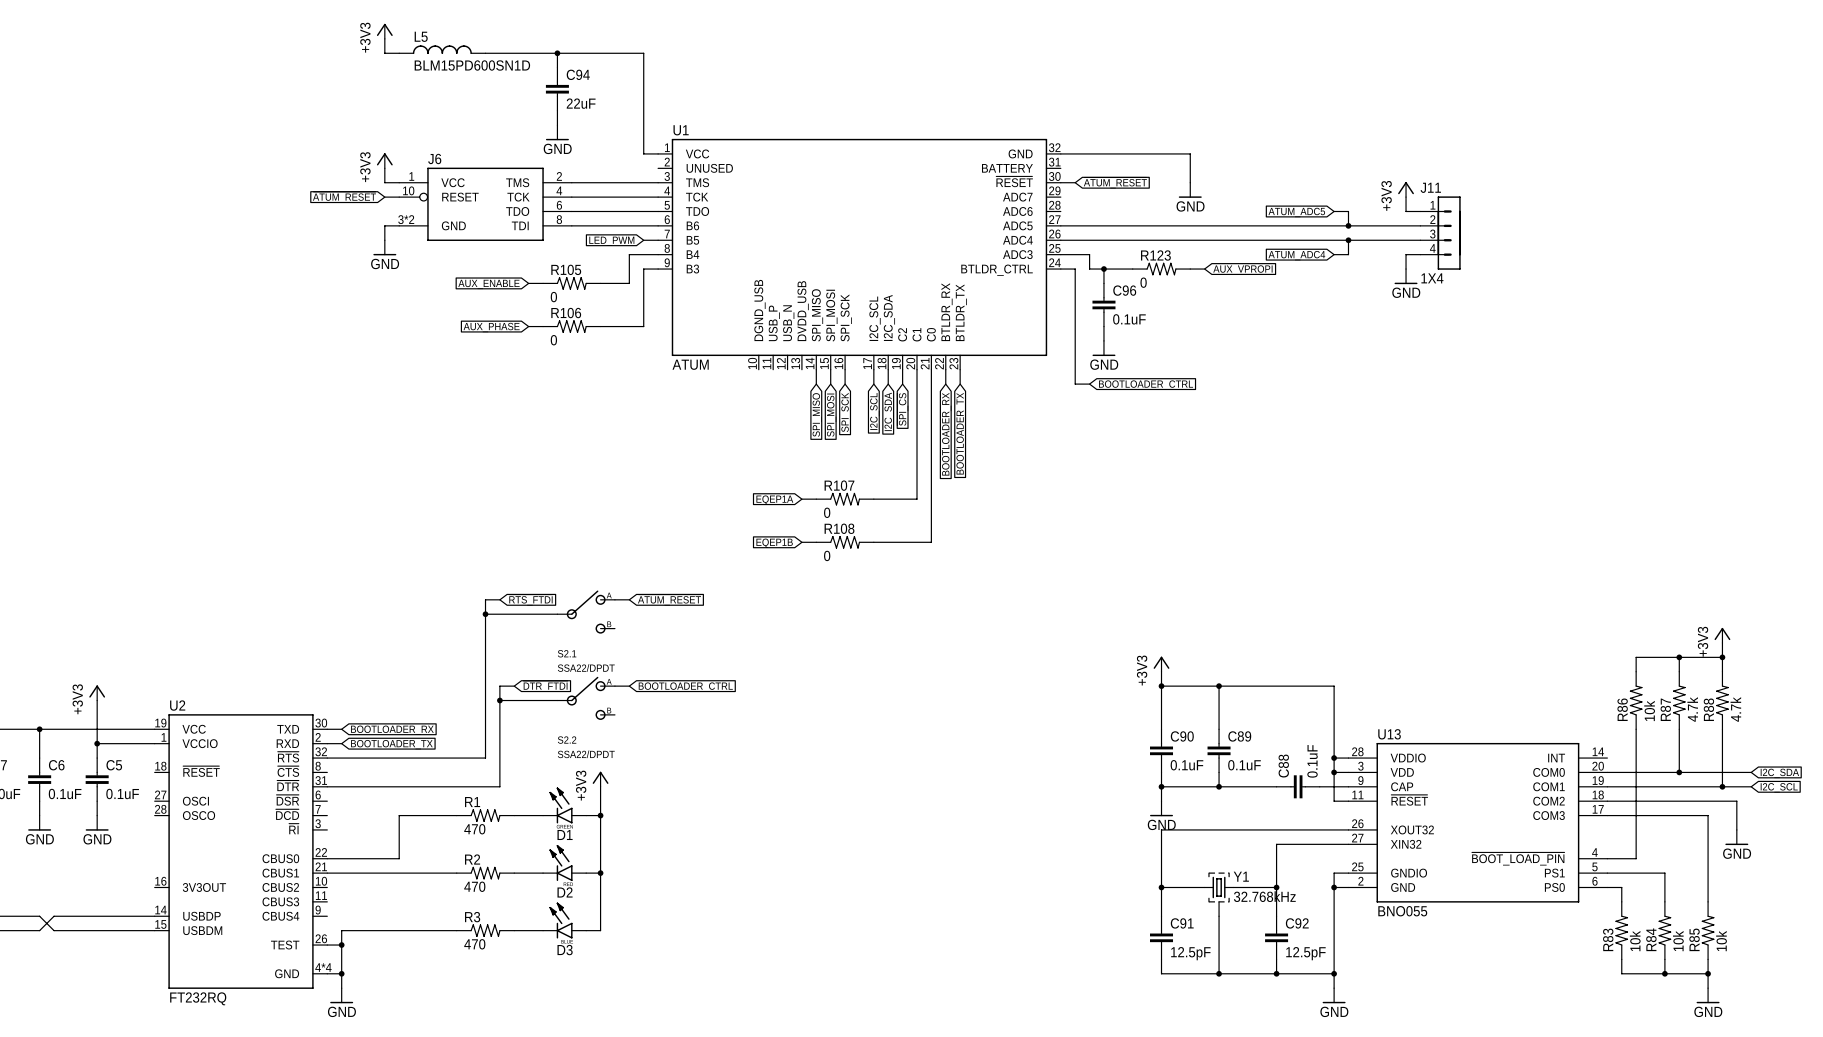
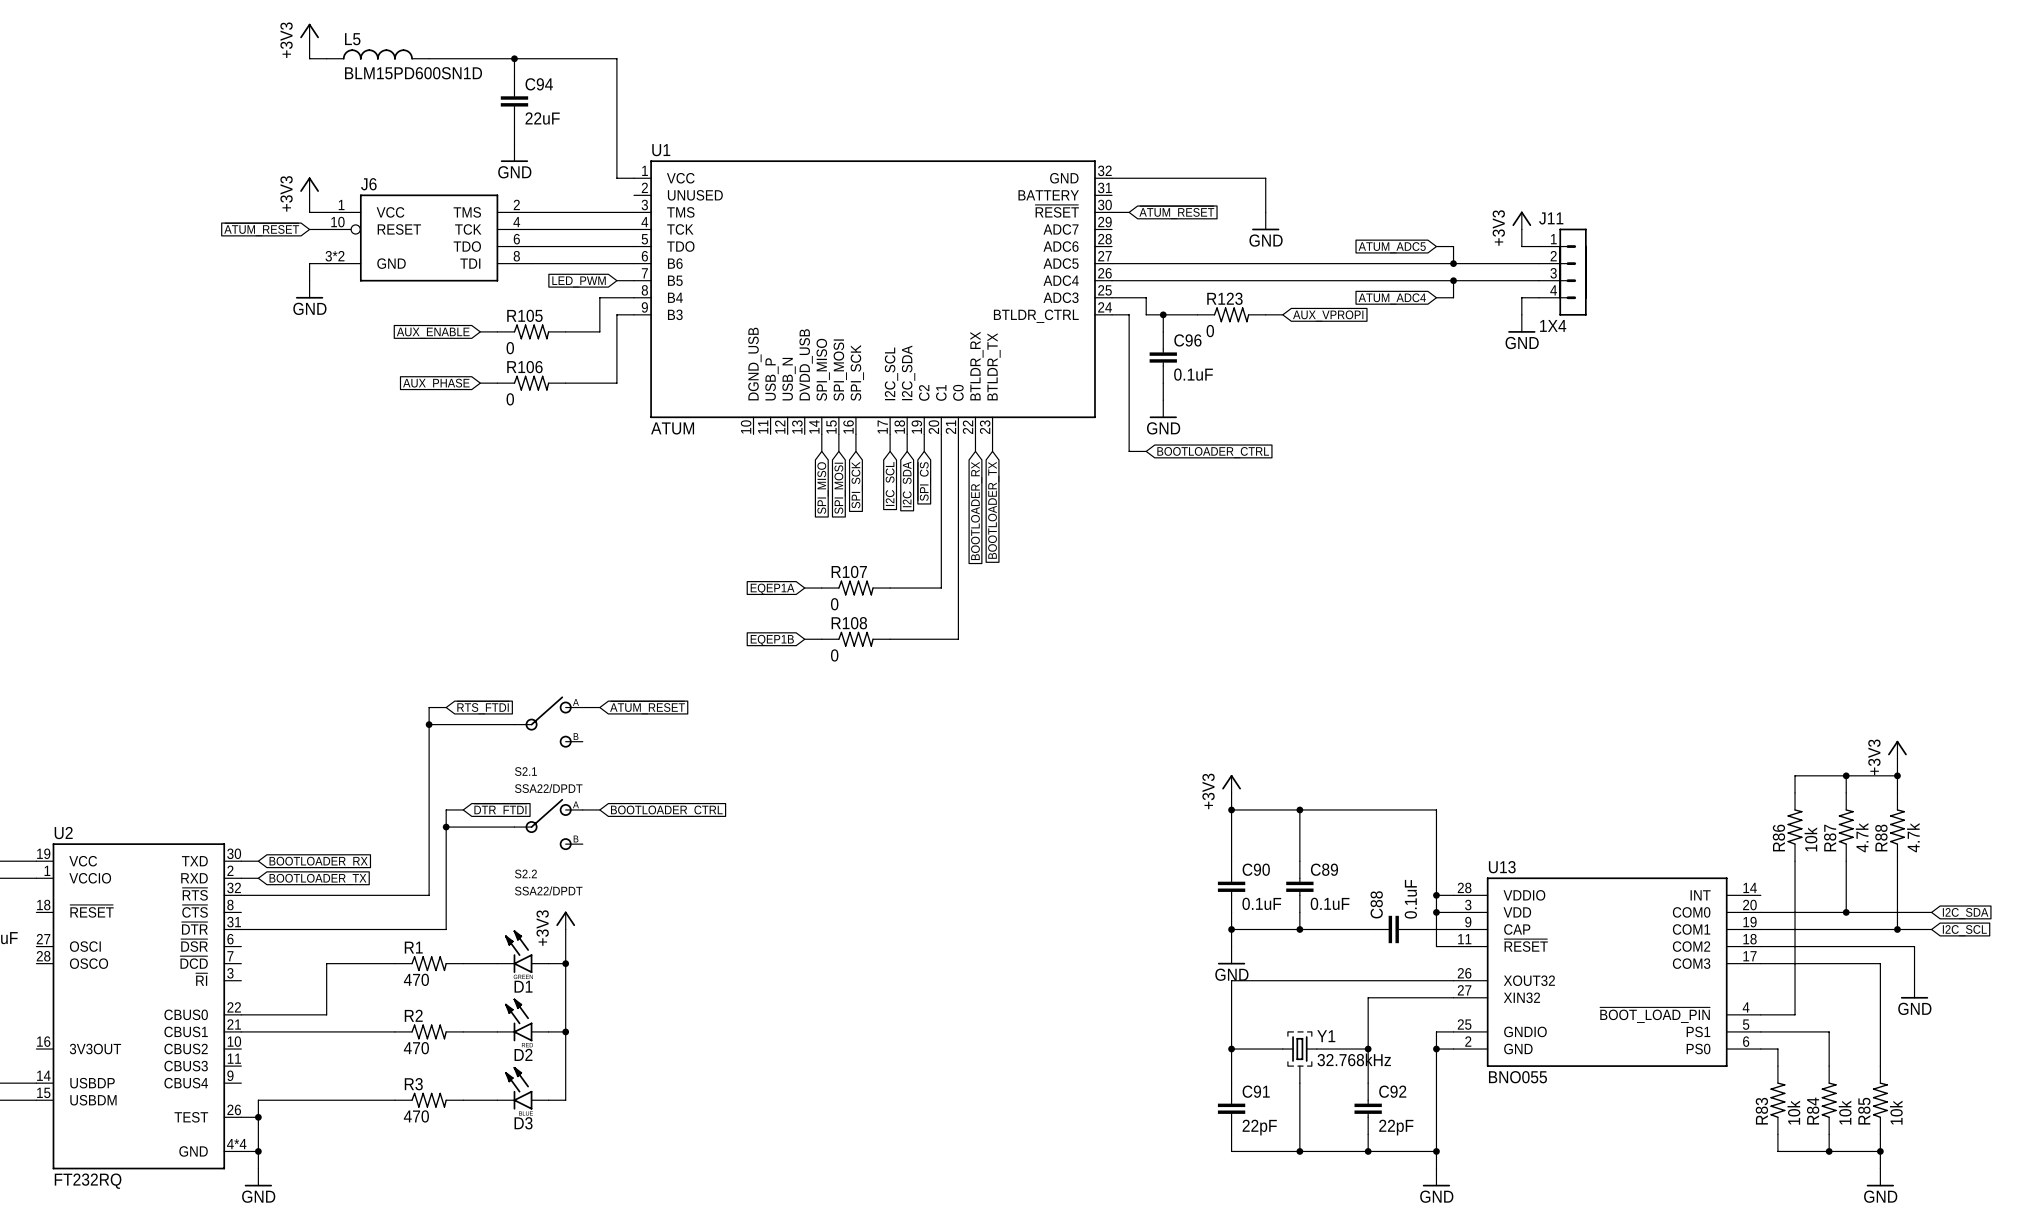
C91 value: 12.5pF (1190, 953) -> 22pF (1259, 1127)
C92 value: 12.5pF (1305, 953) -> 22pF (1396, 1127)

